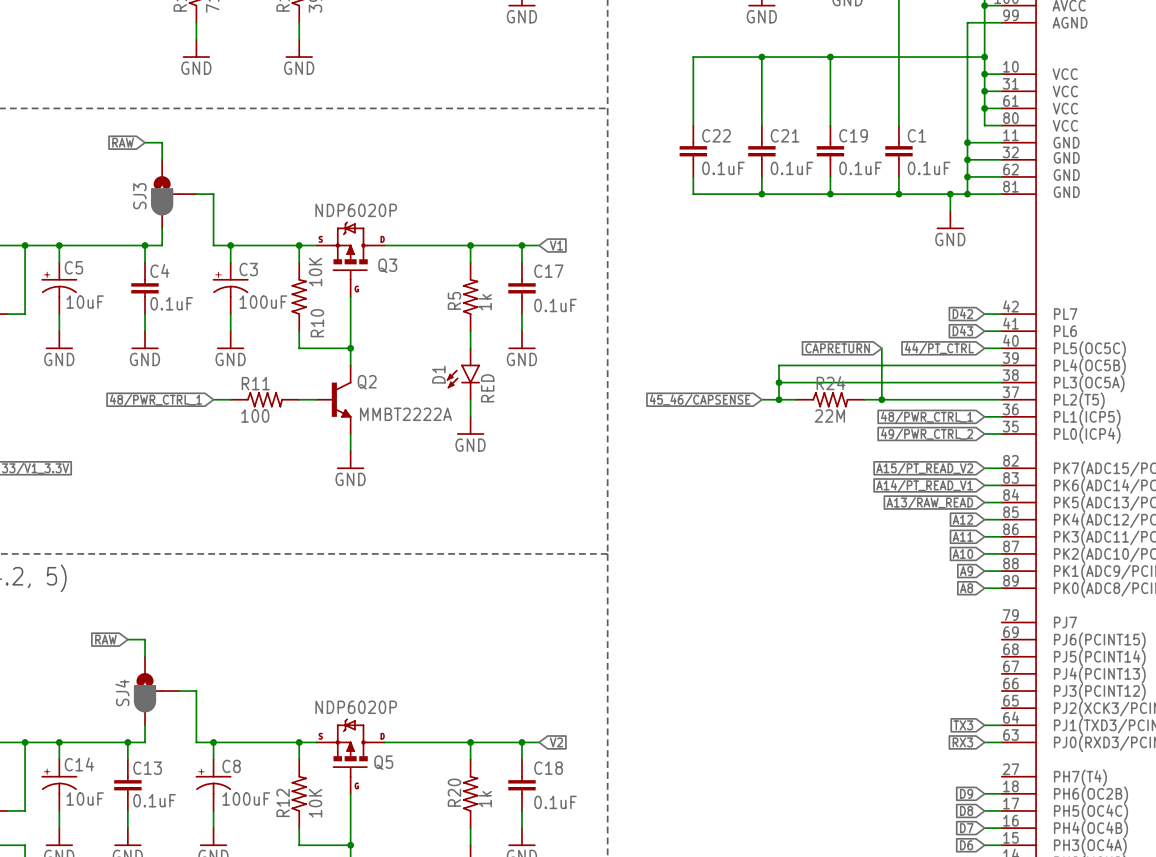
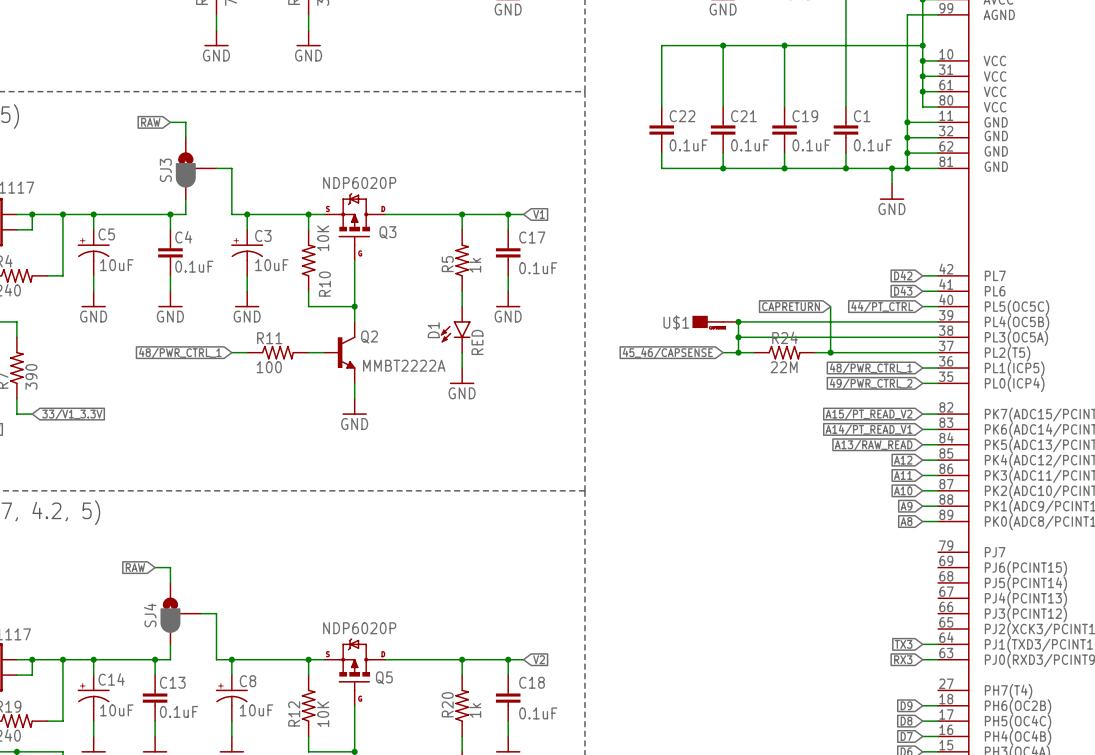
C3 value: 100uF (263, 302) -> 10uF (271, 265)
U$1: none -> (715, 321)
junction: none -> (738, 321)
C8 value: 100uF (246, 798) -> 10uF (256, 710)

